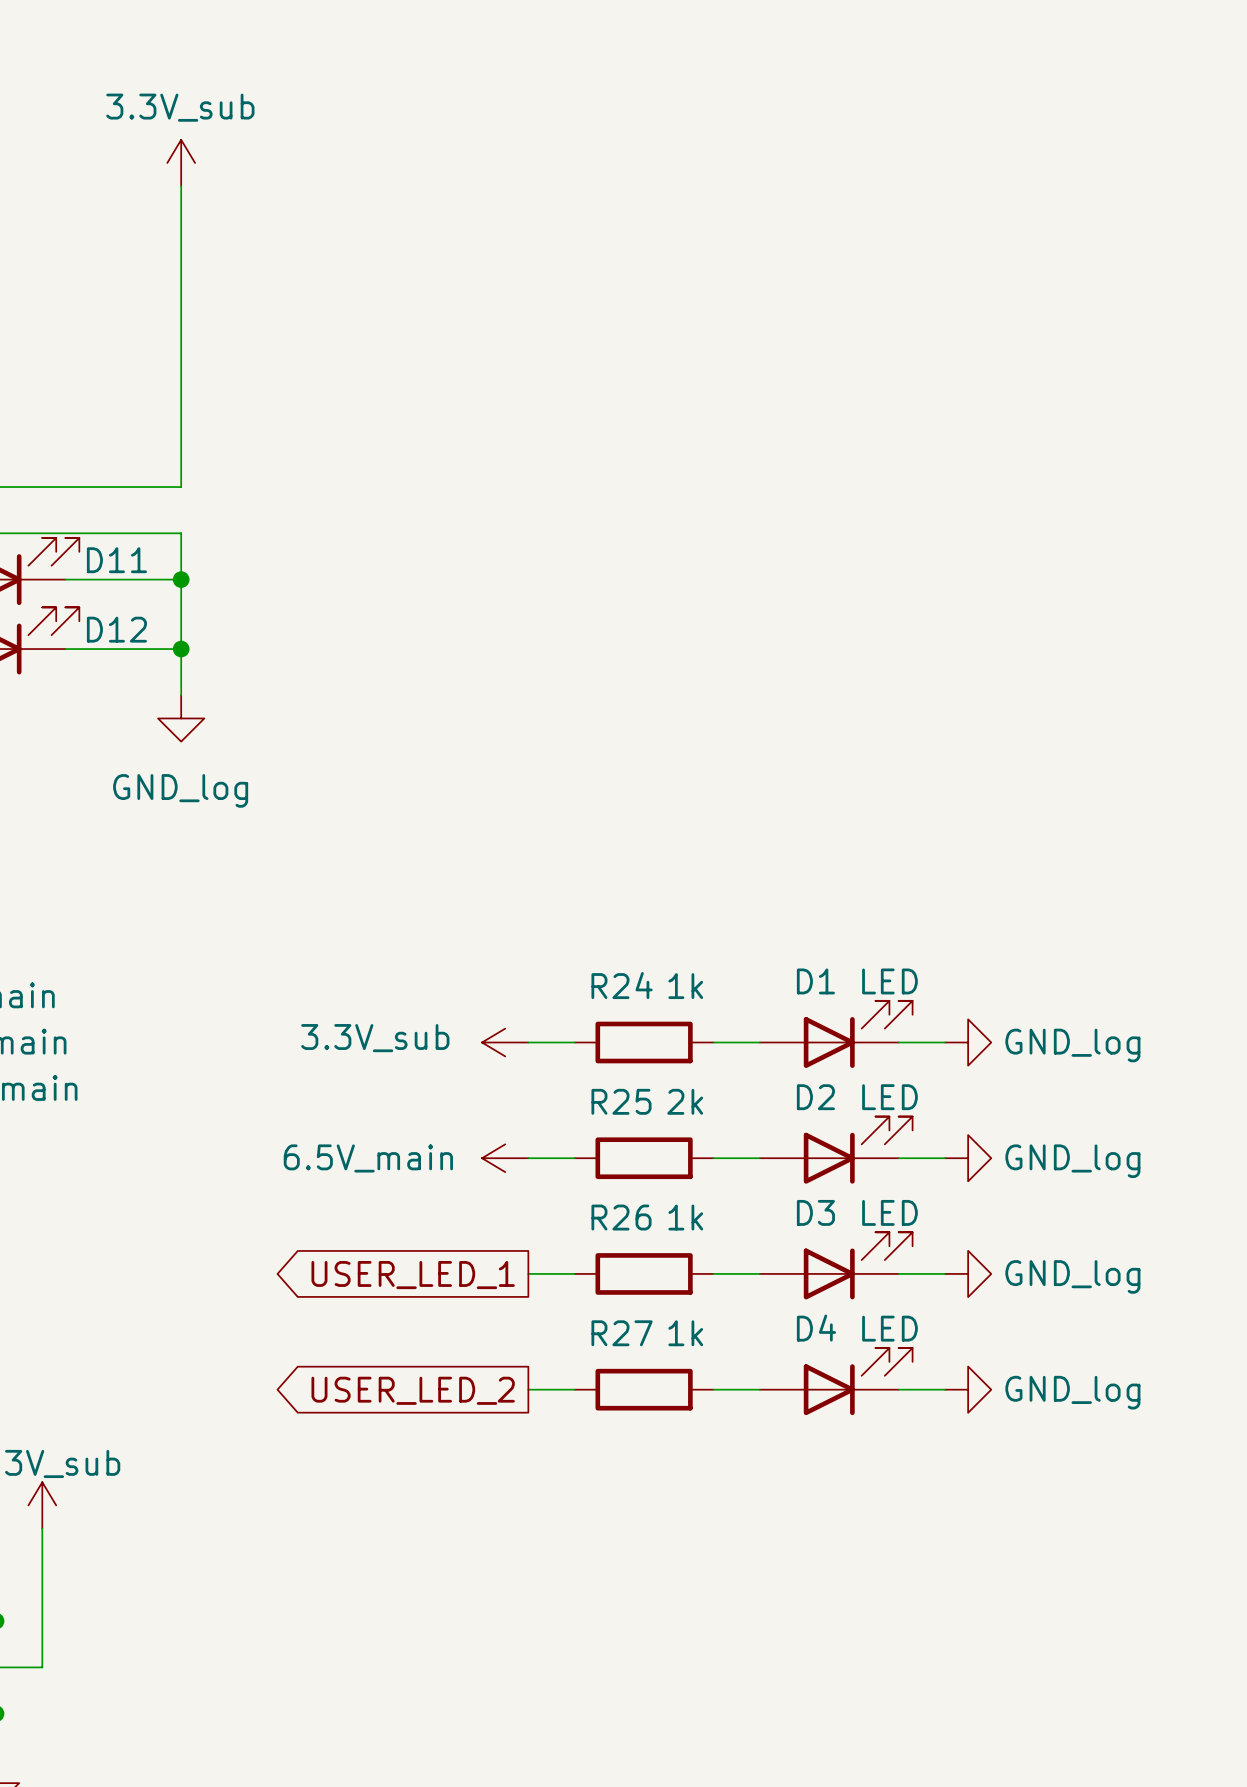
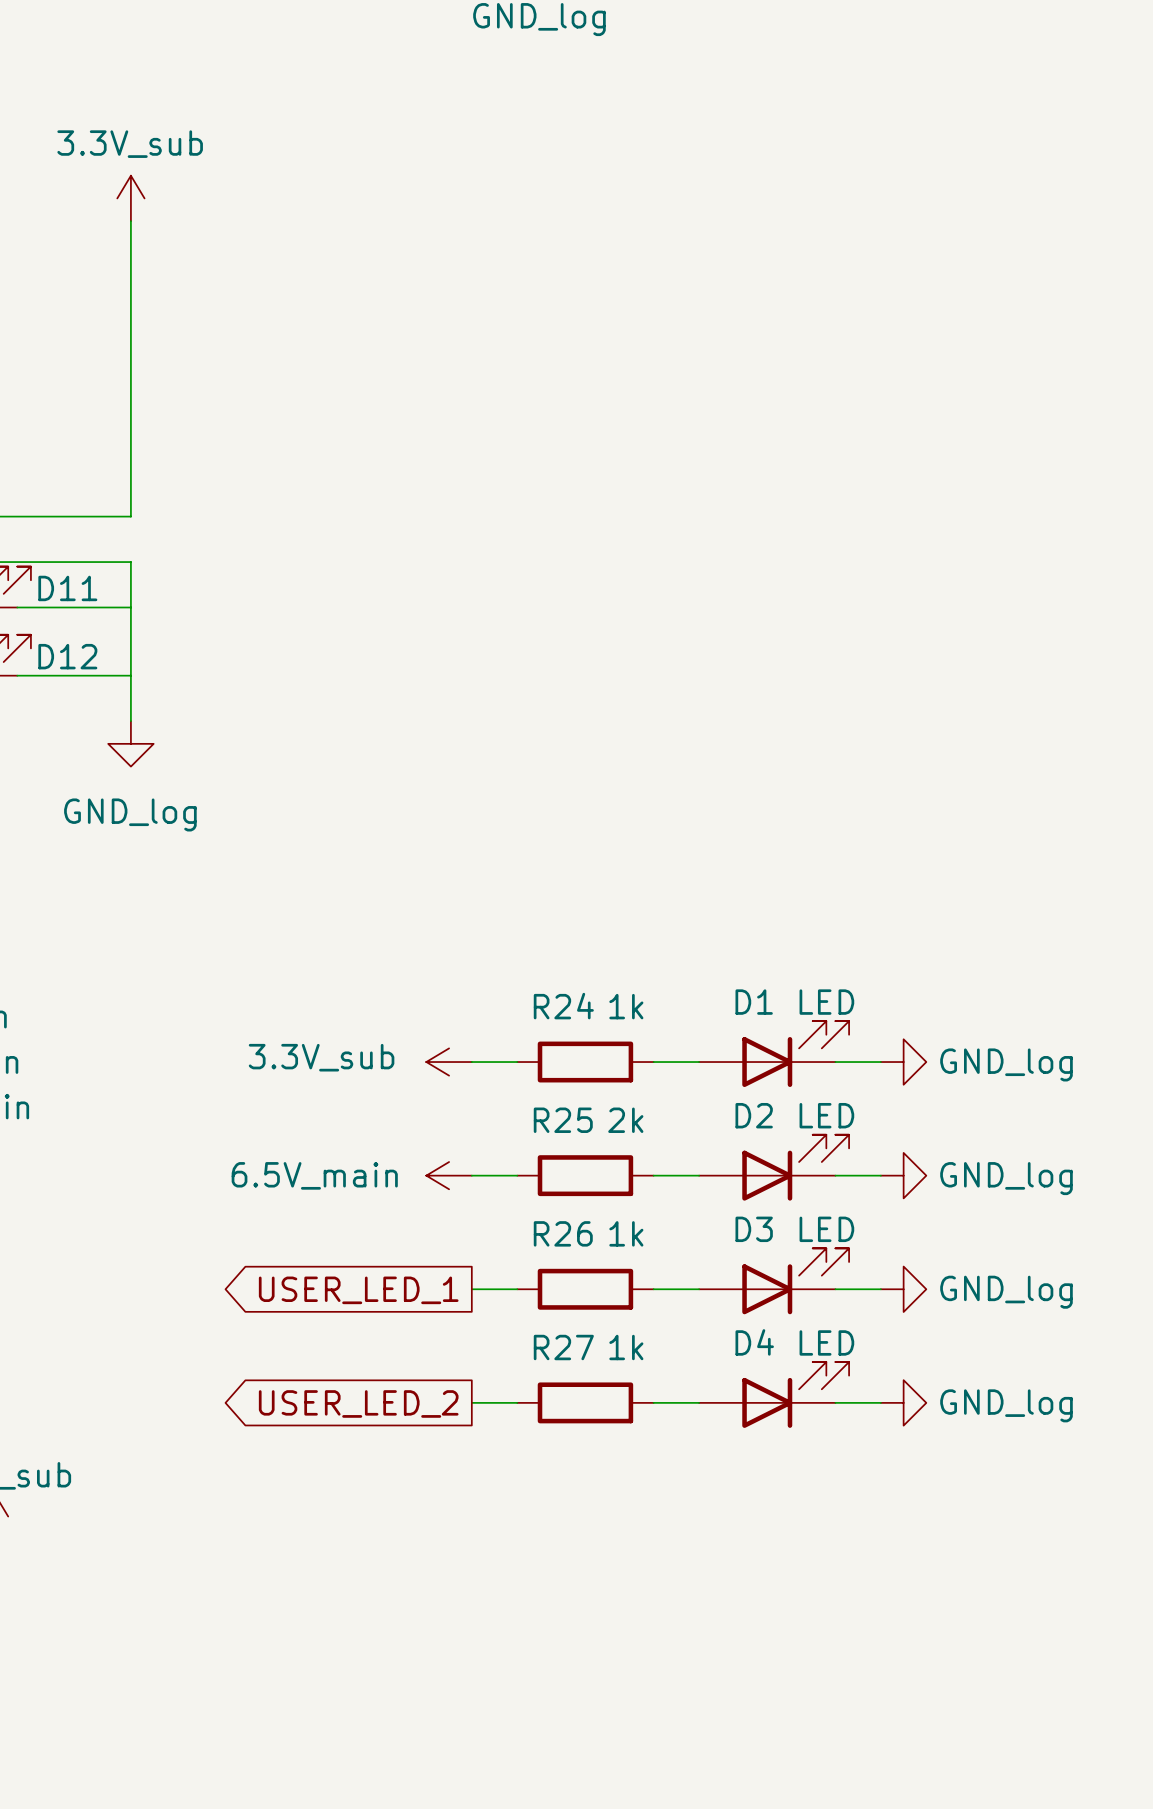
junction: (181, 579) -> none
junction: (181, 649) -> none

